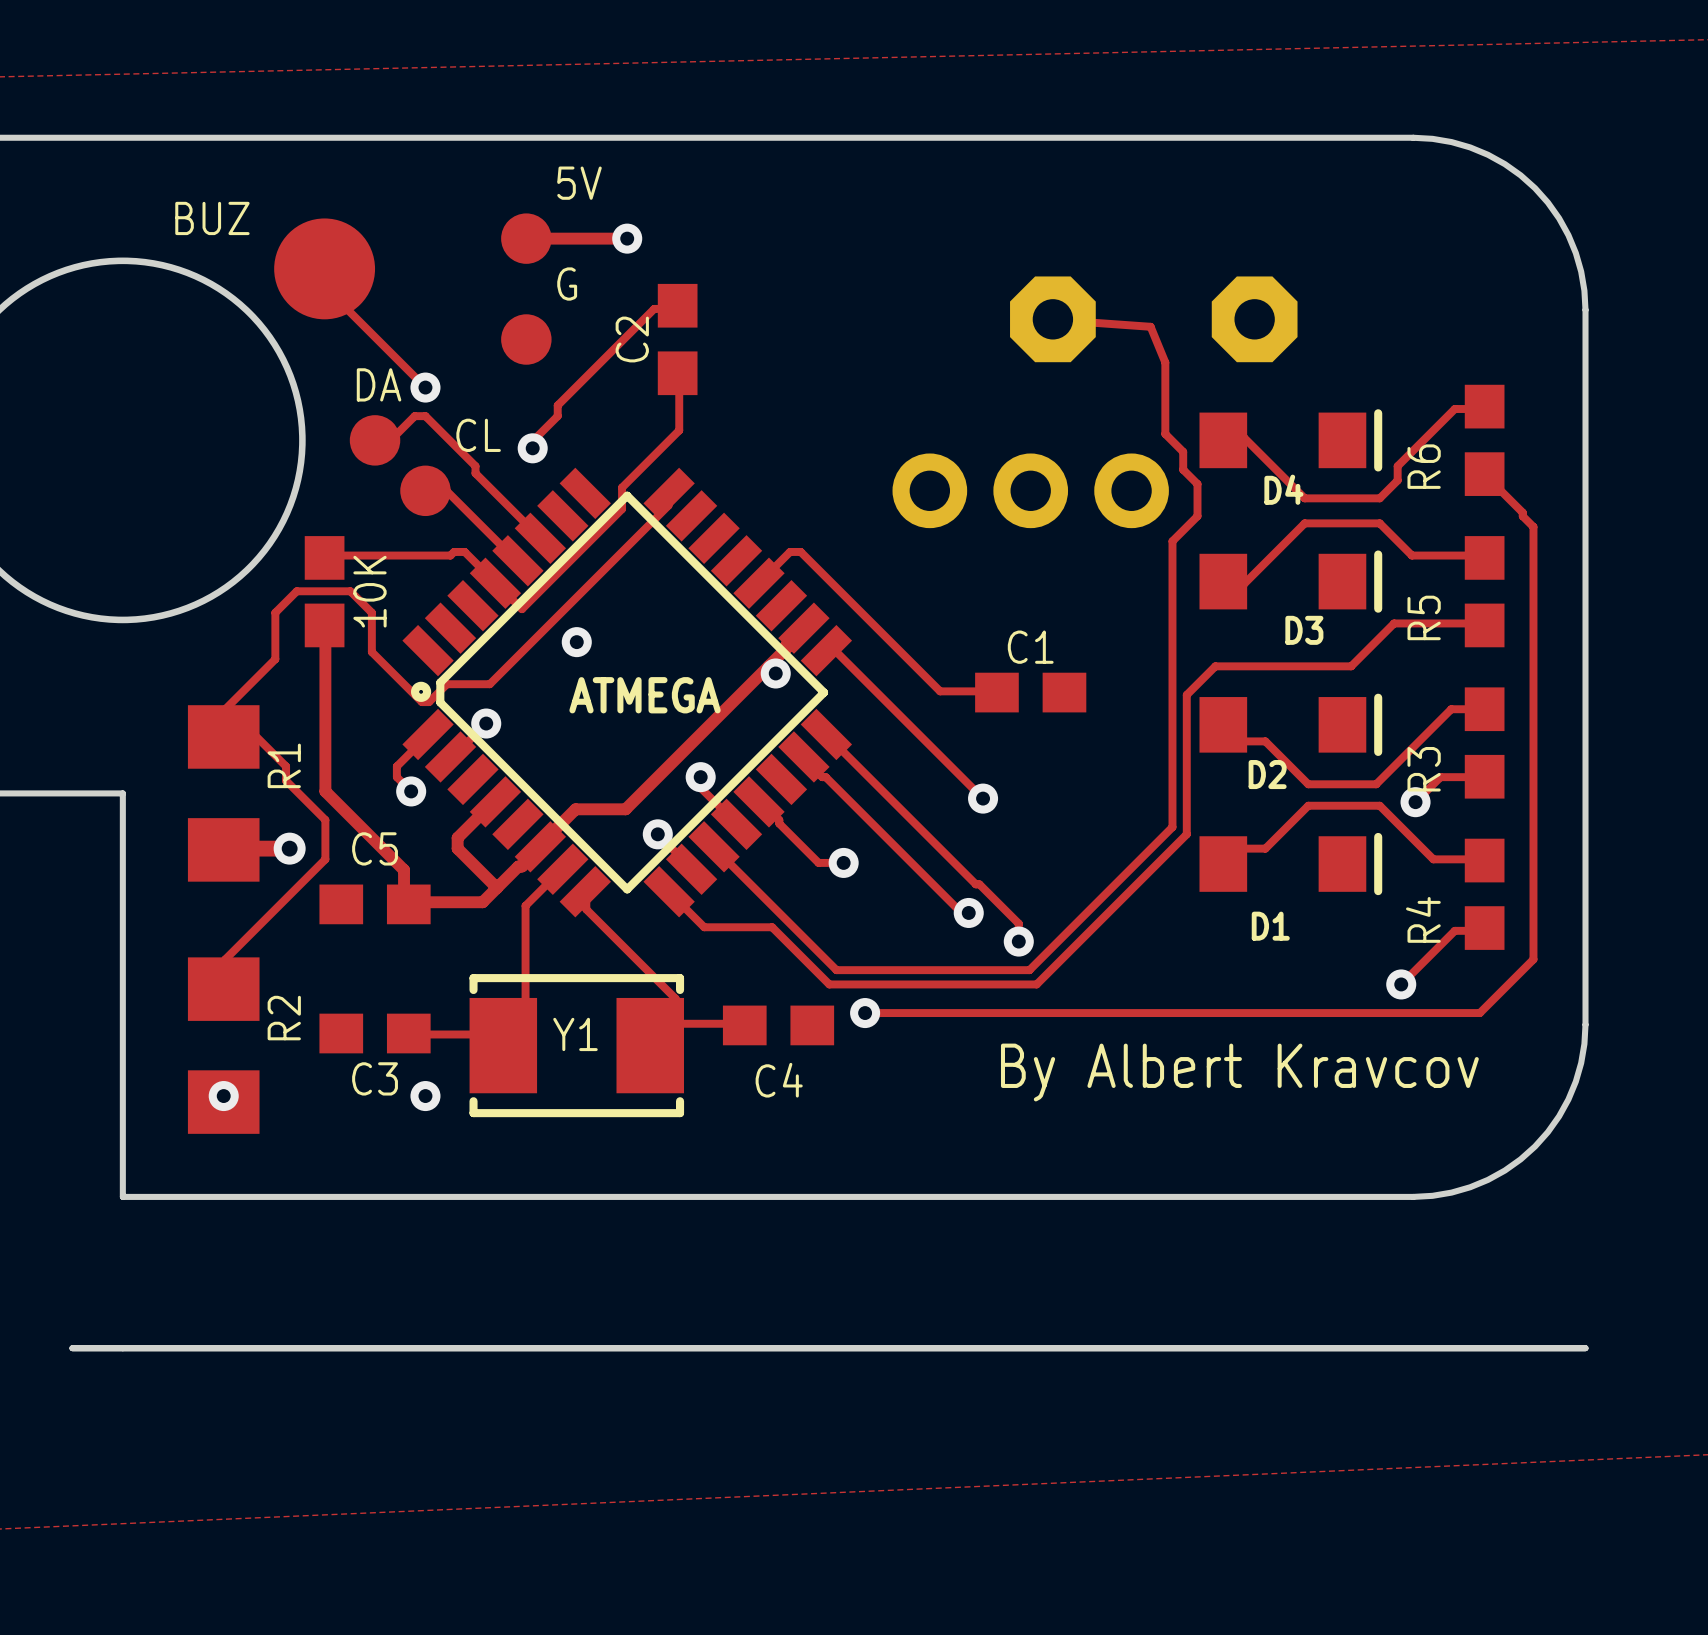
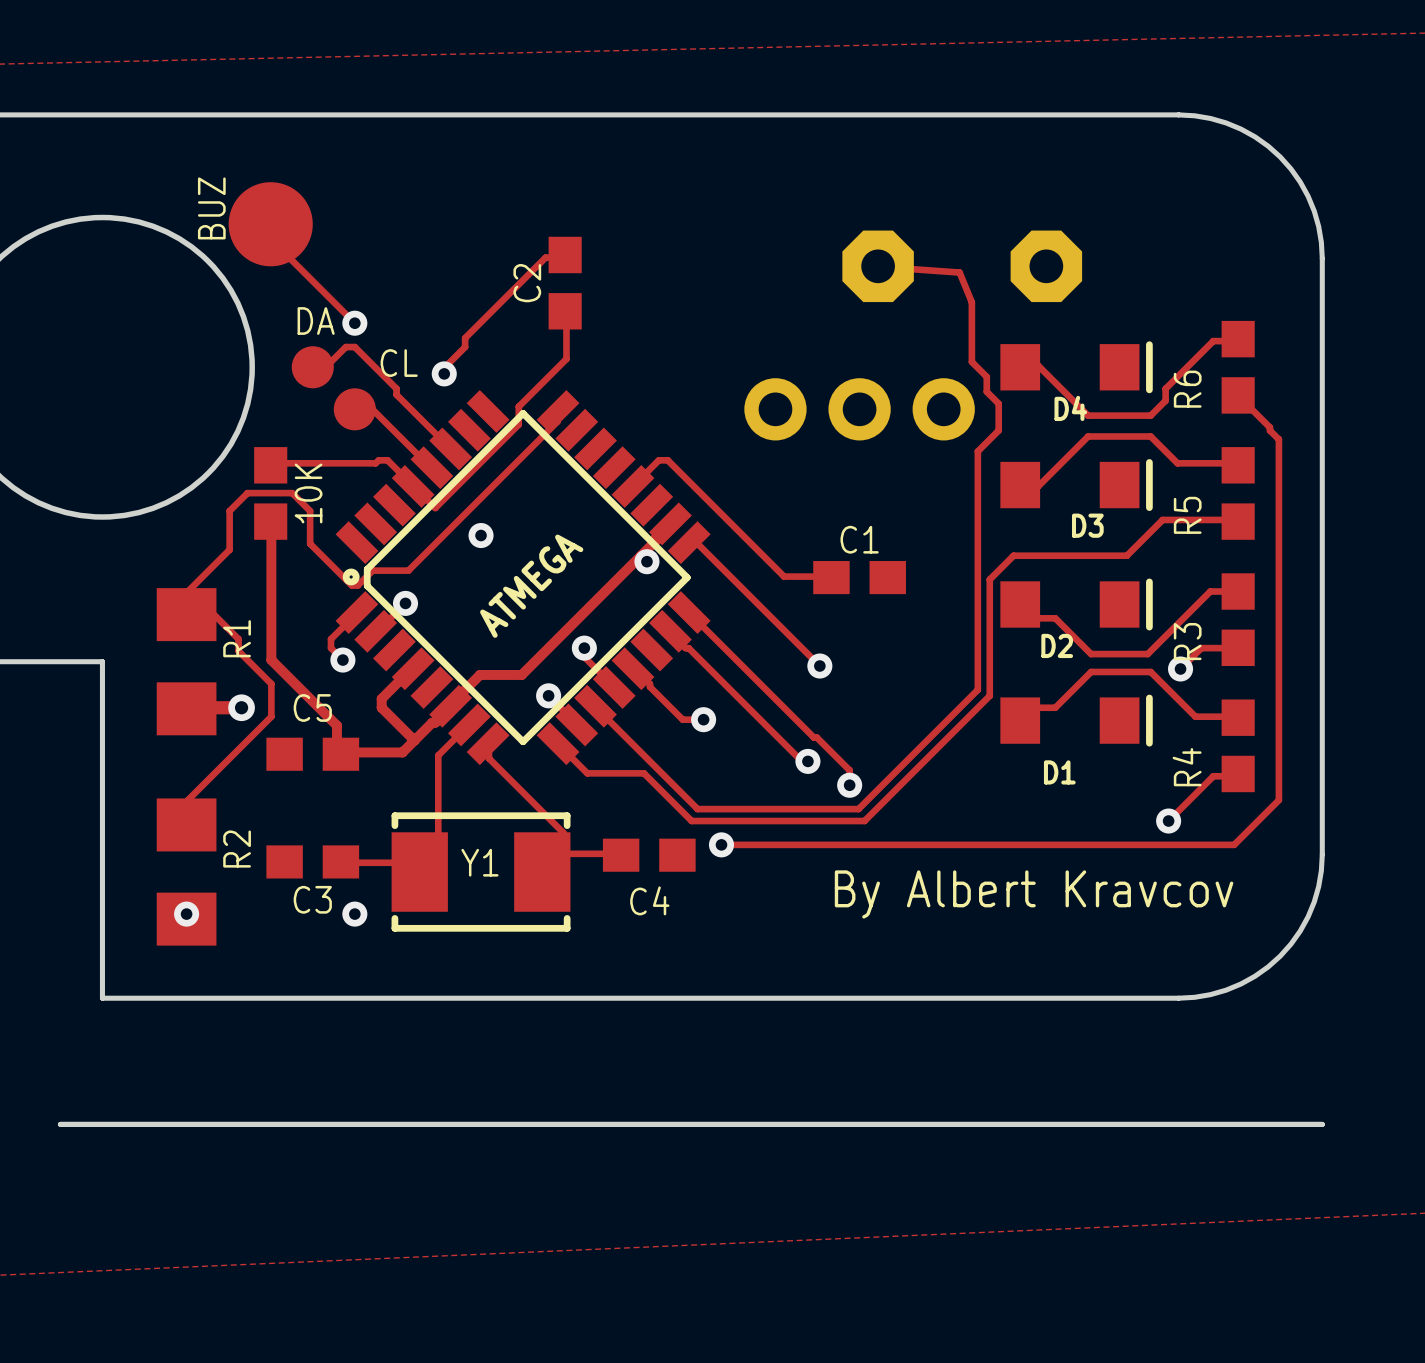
BUZ name rotation: 0° (212, 218) -> 90° counterclockwise (211, 208)
track: (526, 238) (627, 238) -> none
5V: (526, 238) -> none
via: (627, 238) -> none
G: (526, 339) -> none
ATMEGA name rotation: 0° (645, 695) -> 45° counterclockwise (531, 586)

